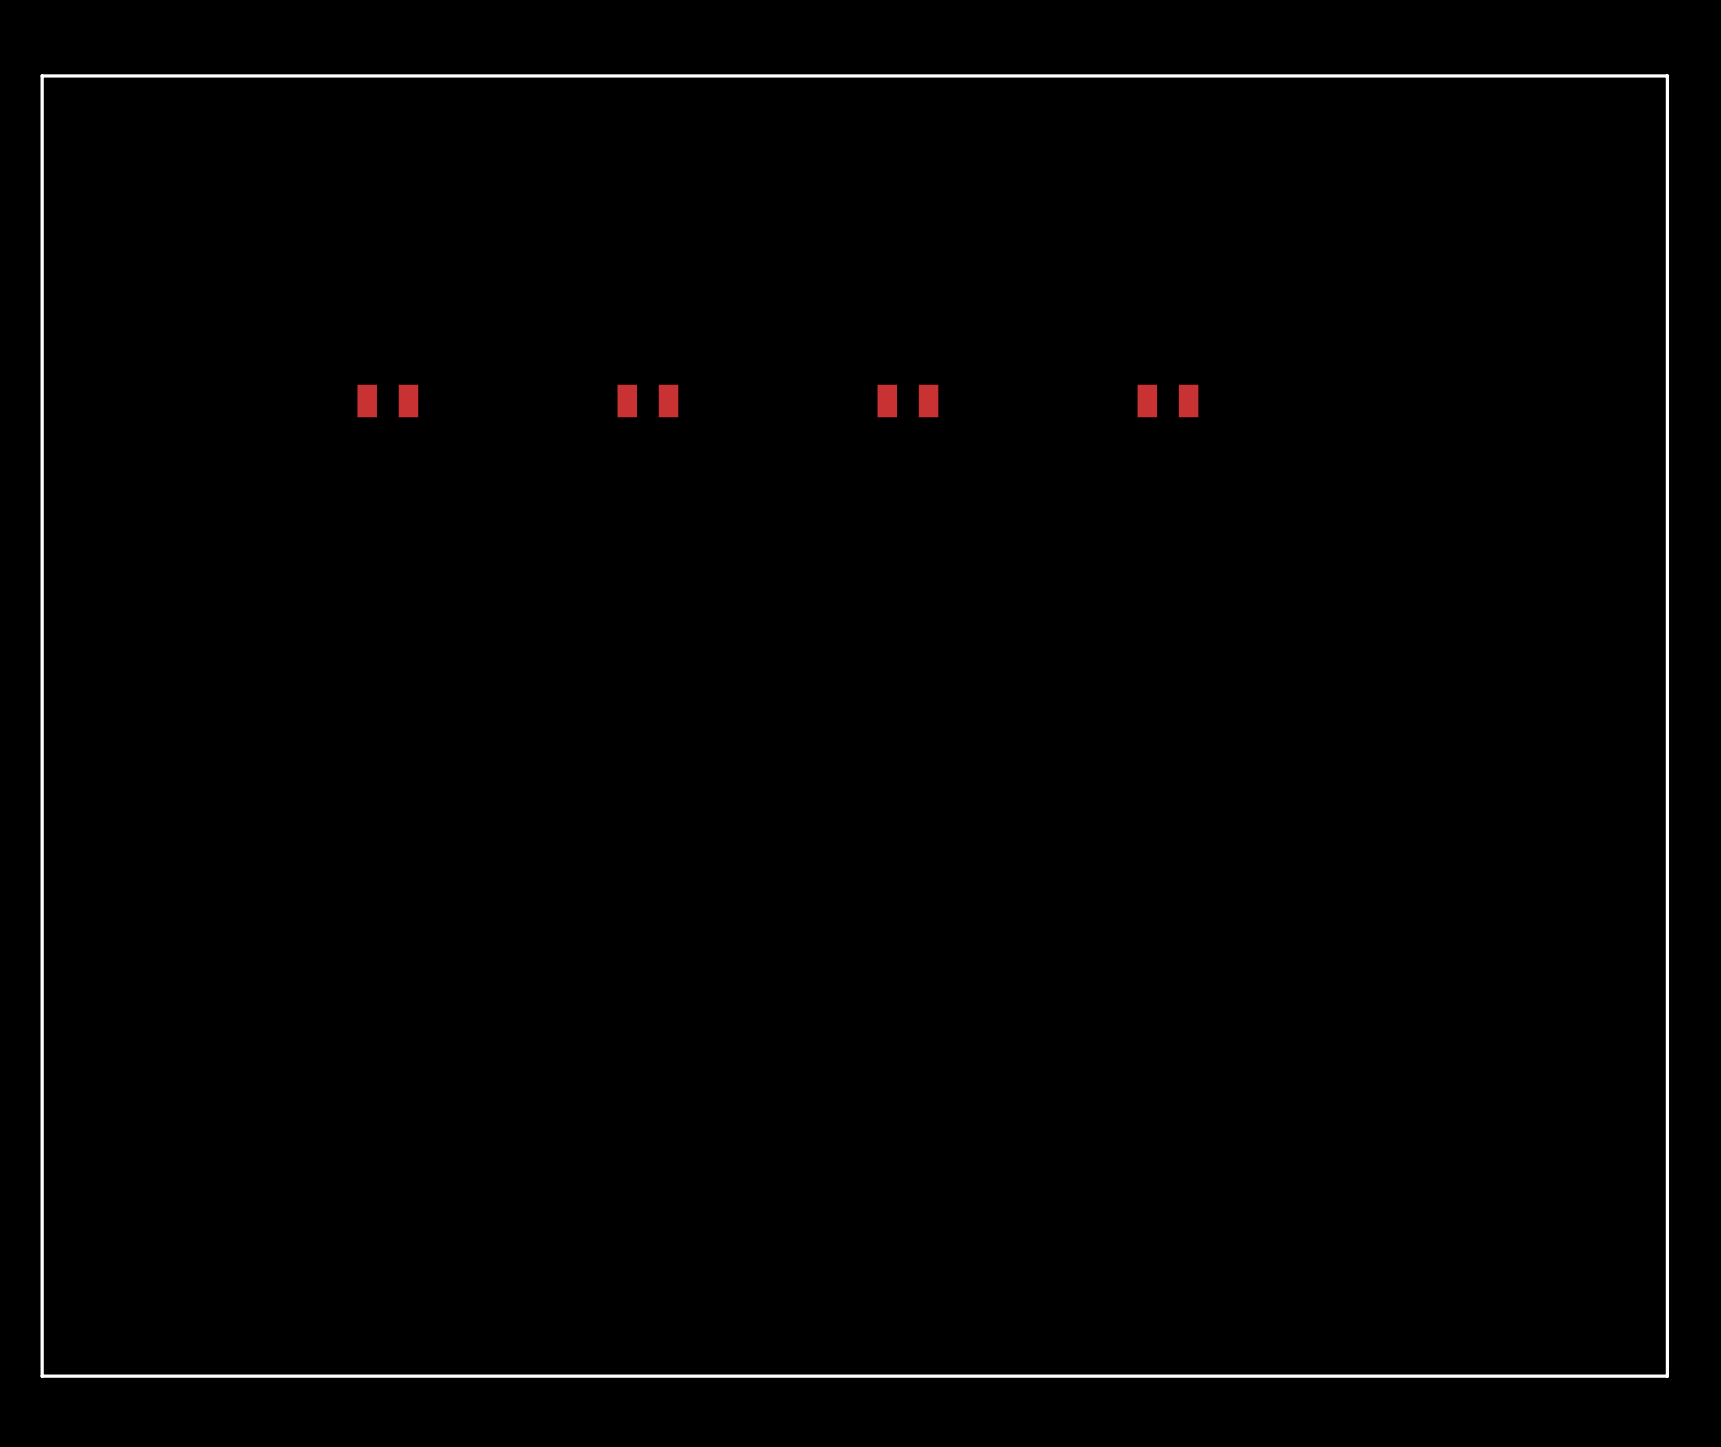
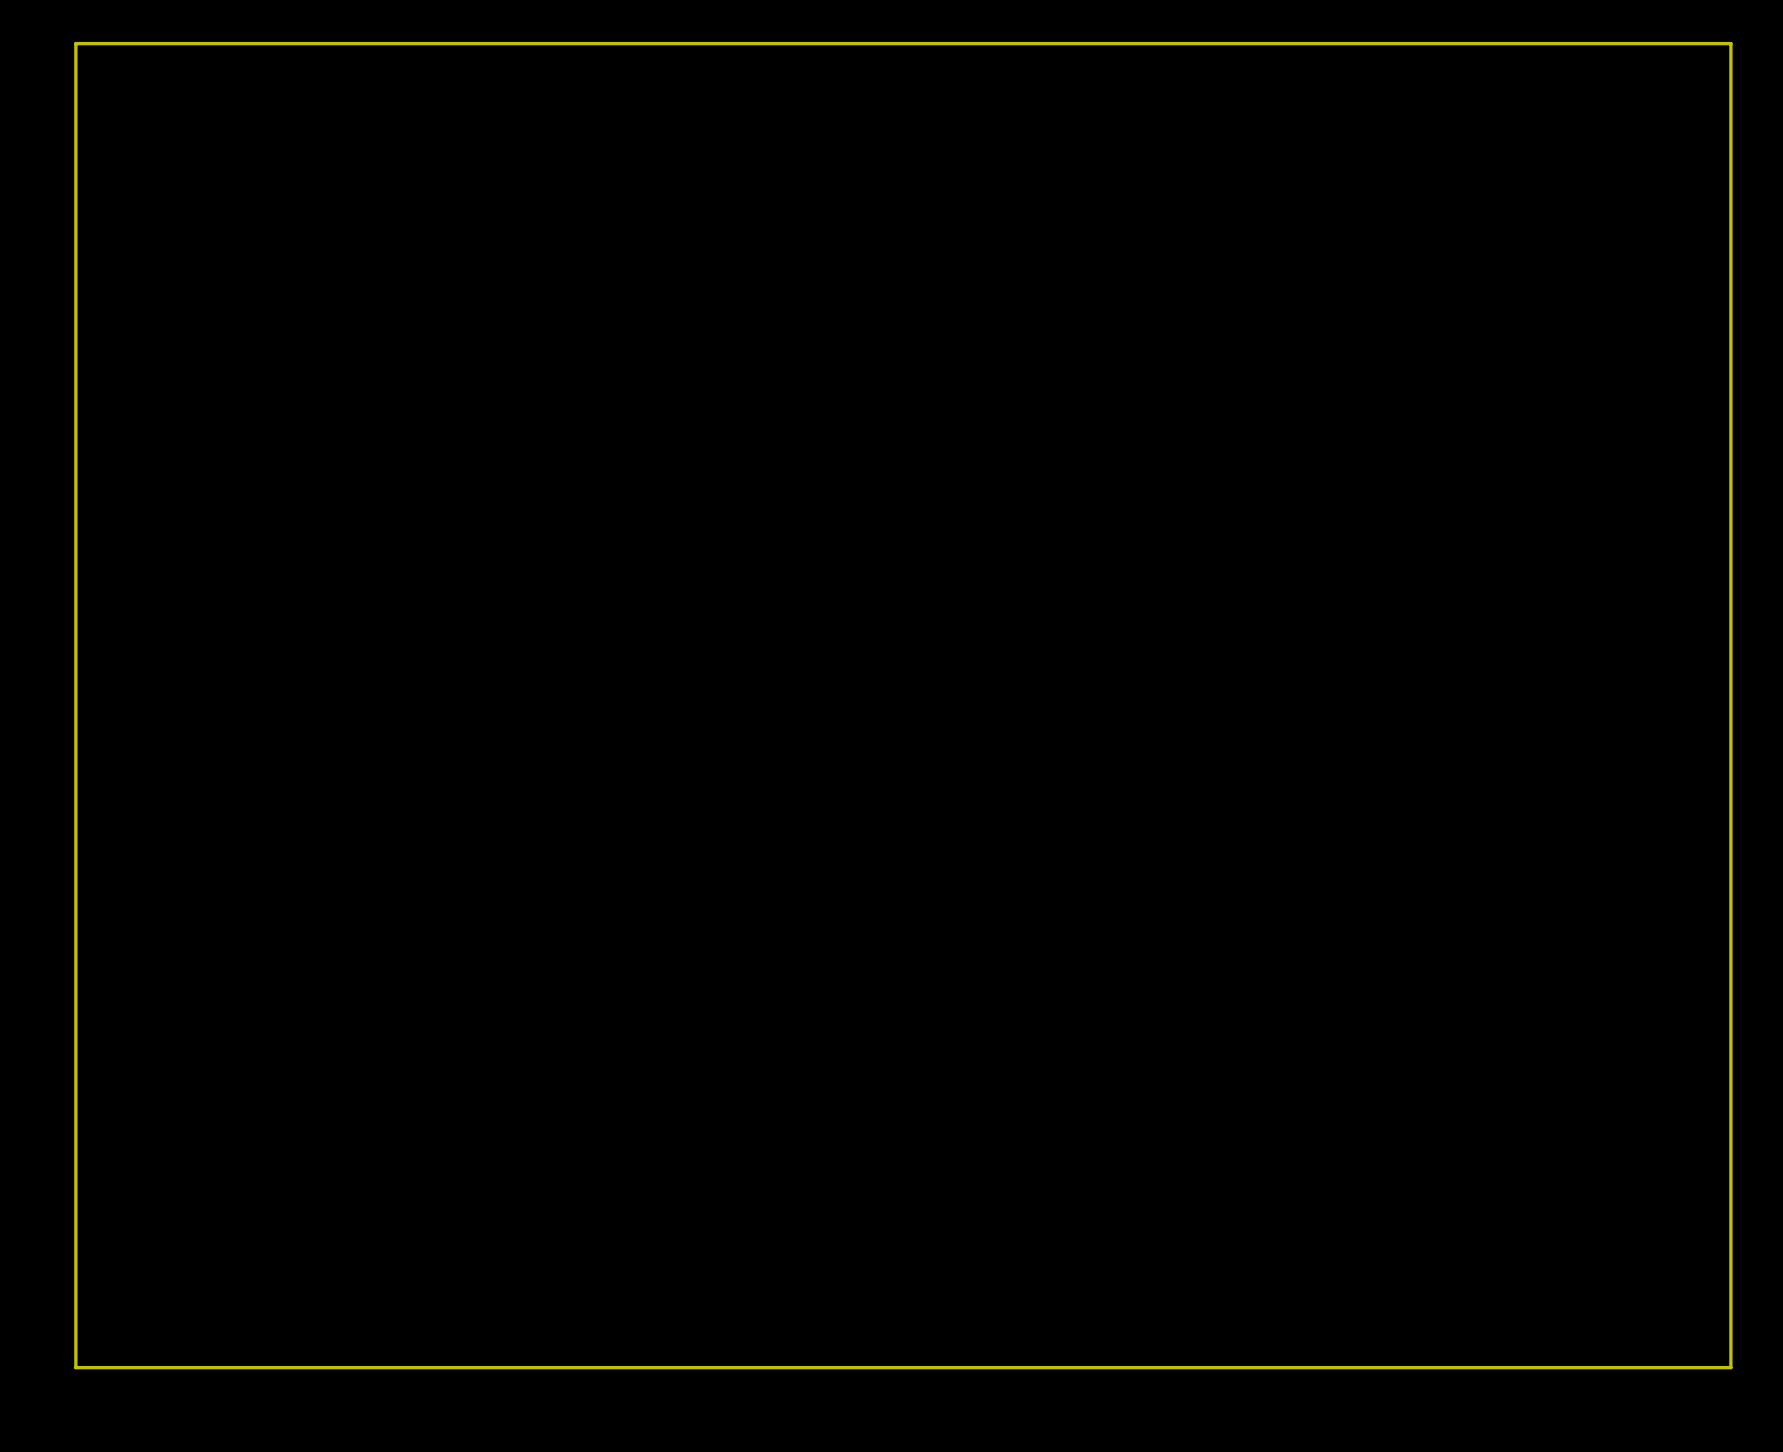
part: (387, 401) -> none
part: (647, 401) -> none
part: (907, 401) -> none
part: (1167, 401) -> none

